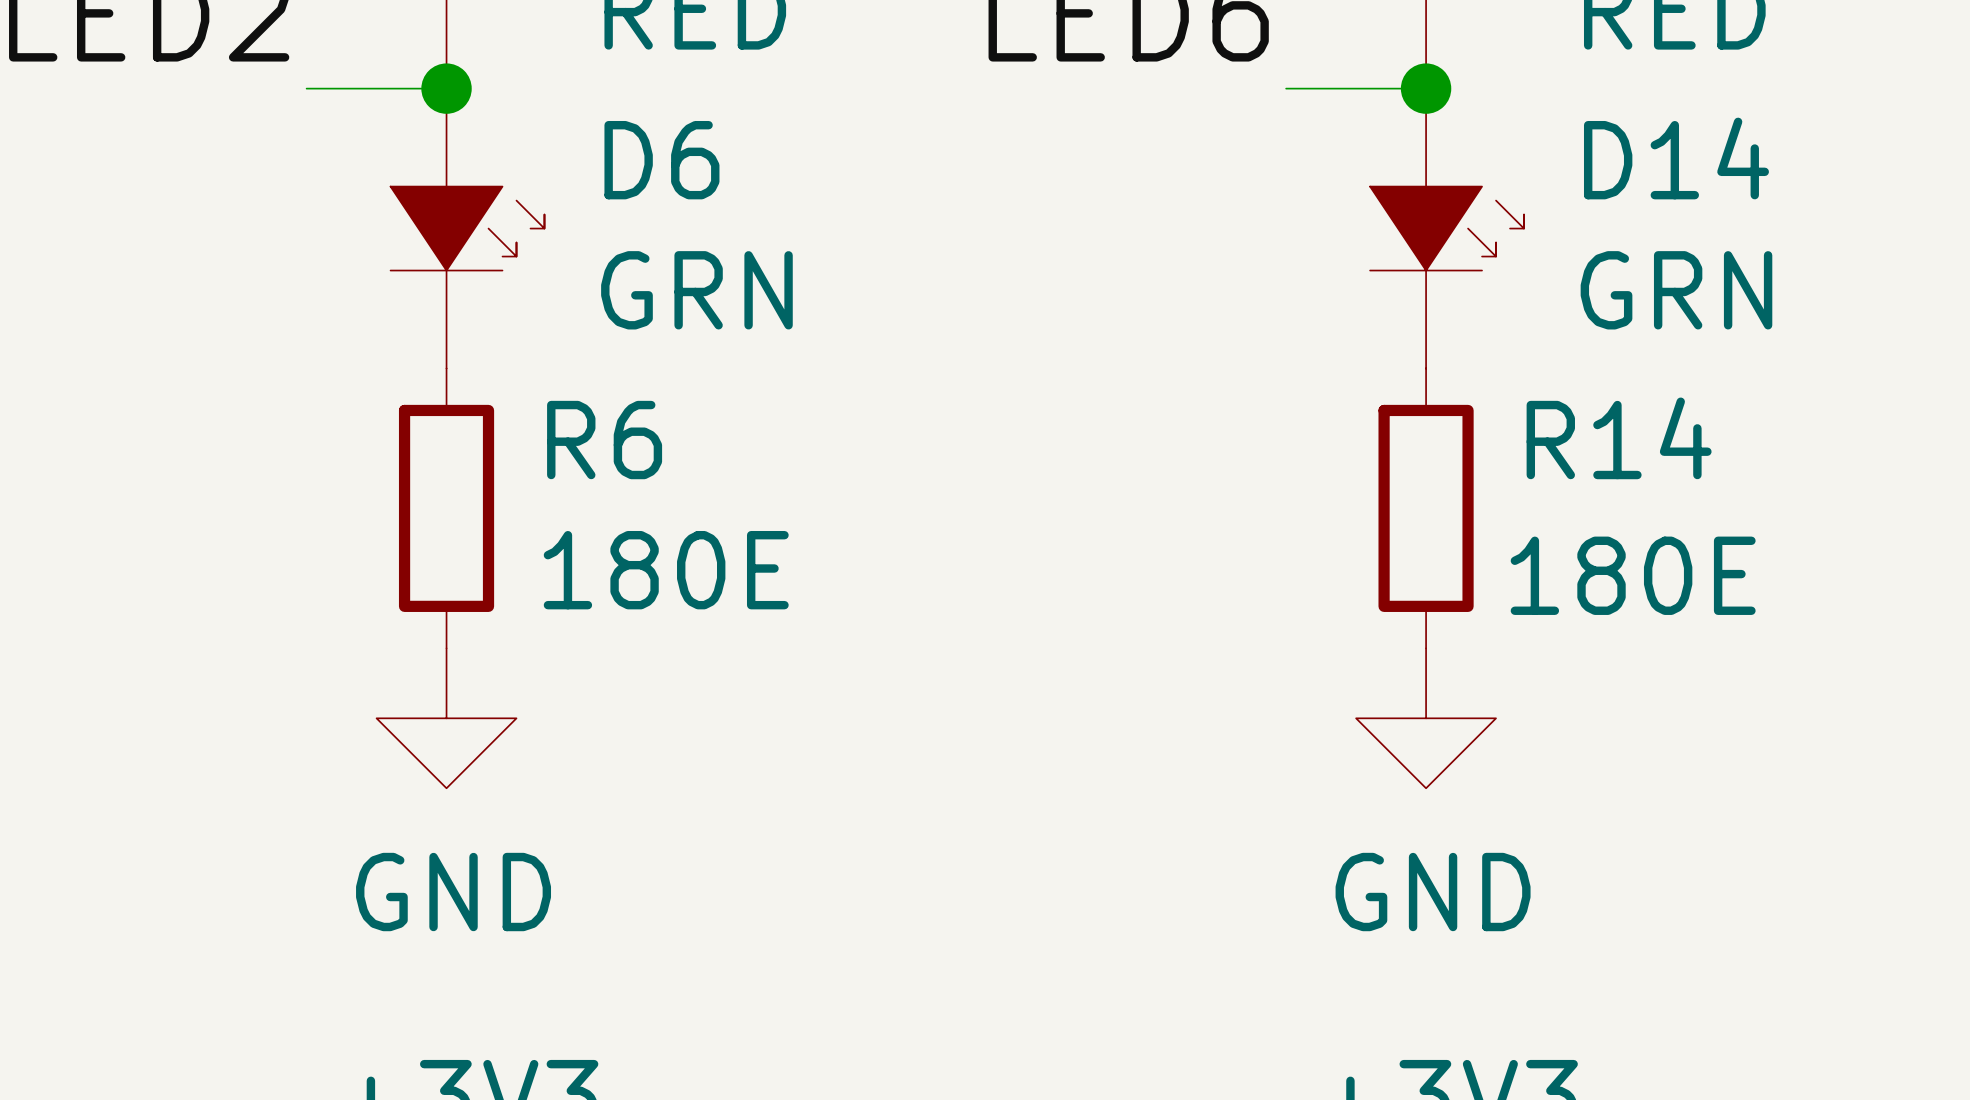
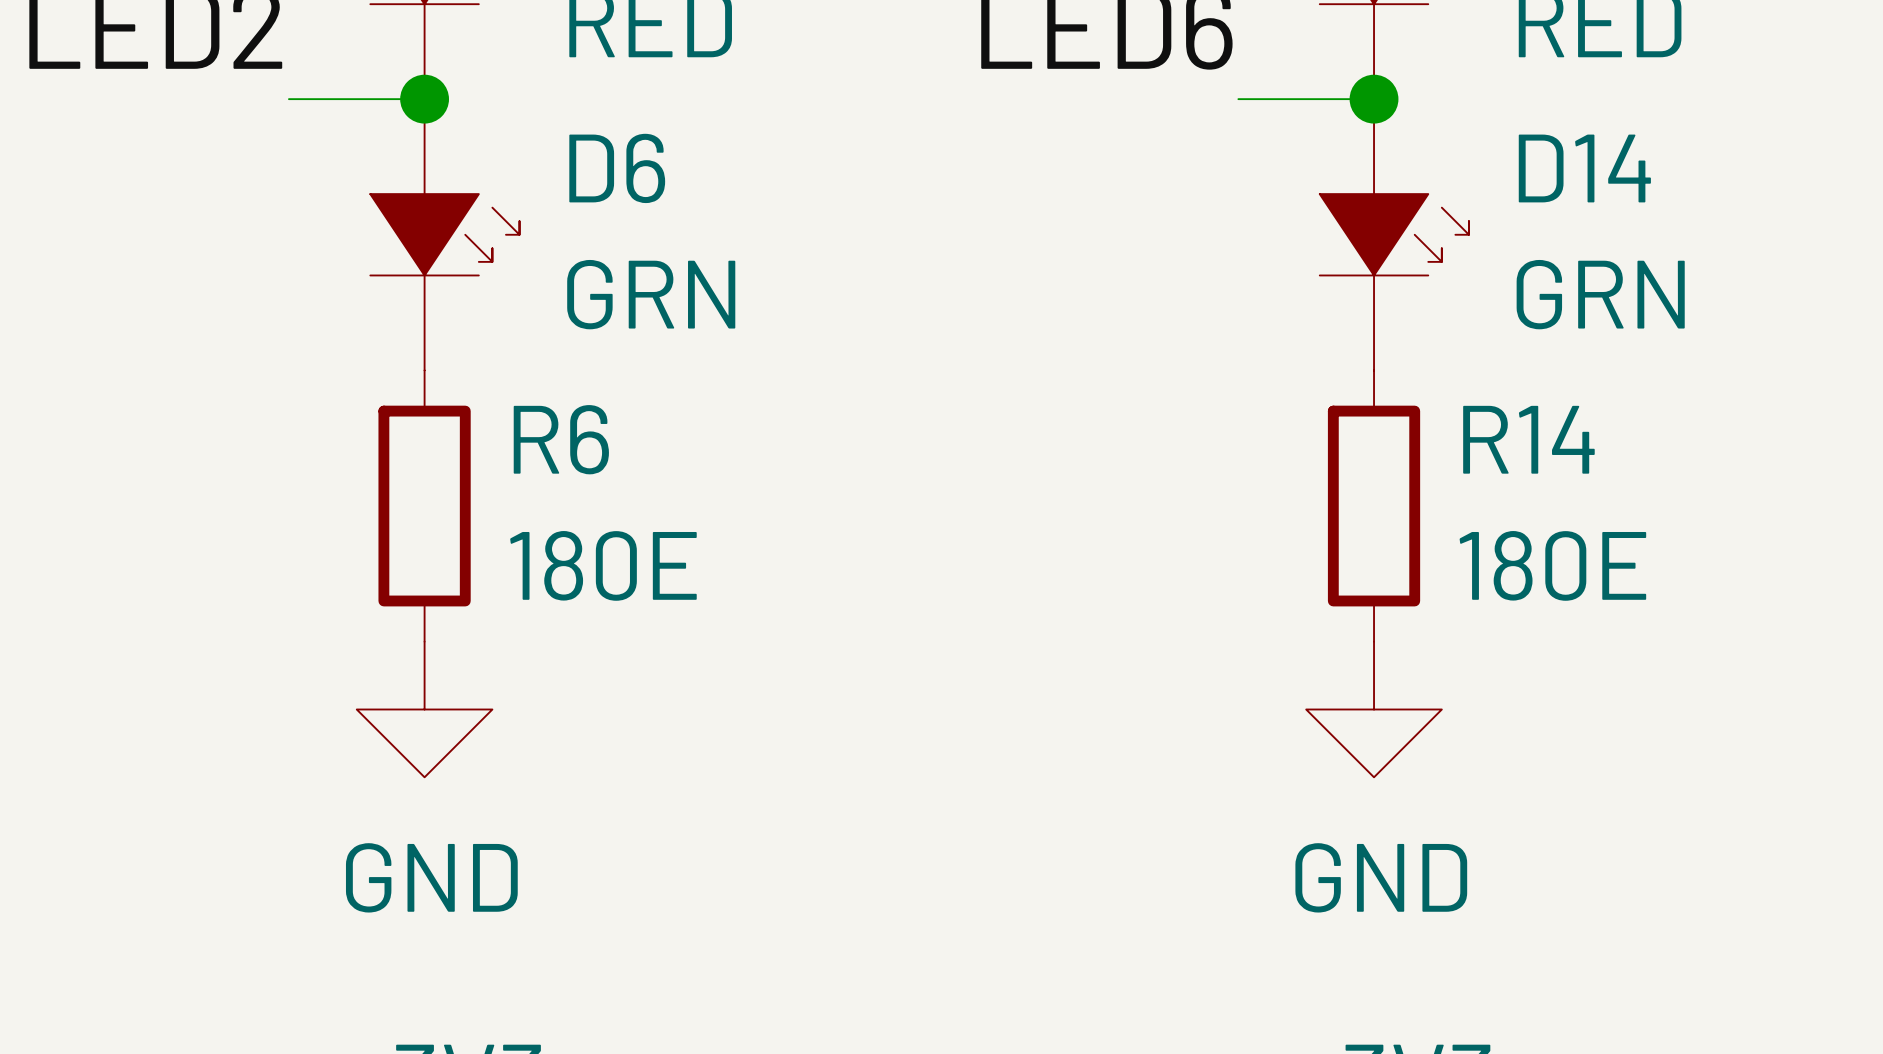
R14 value position: 180E (1633, 575) -> 180E (1552, 565)

